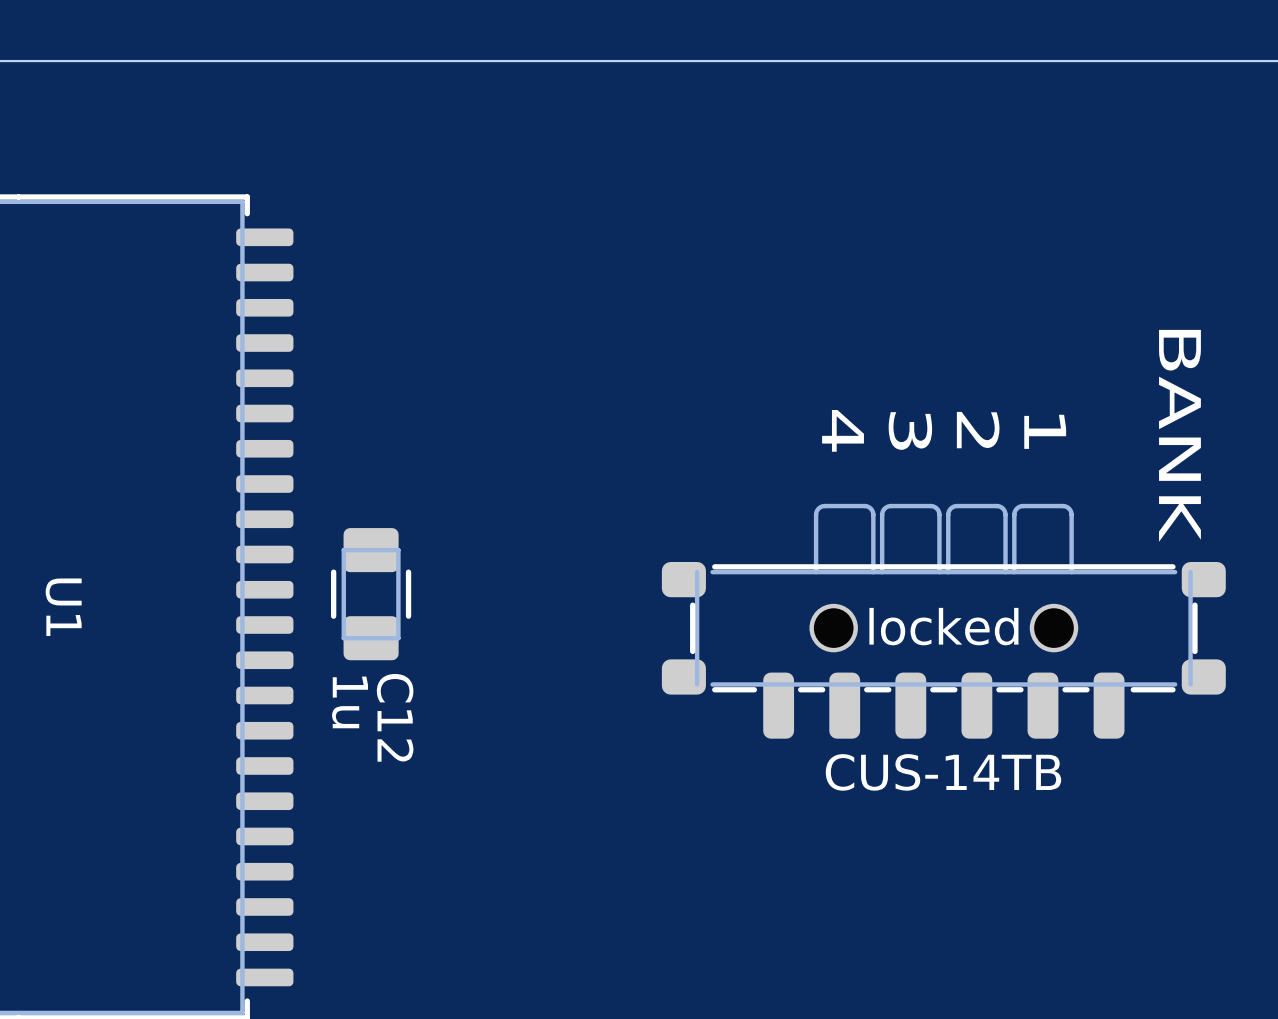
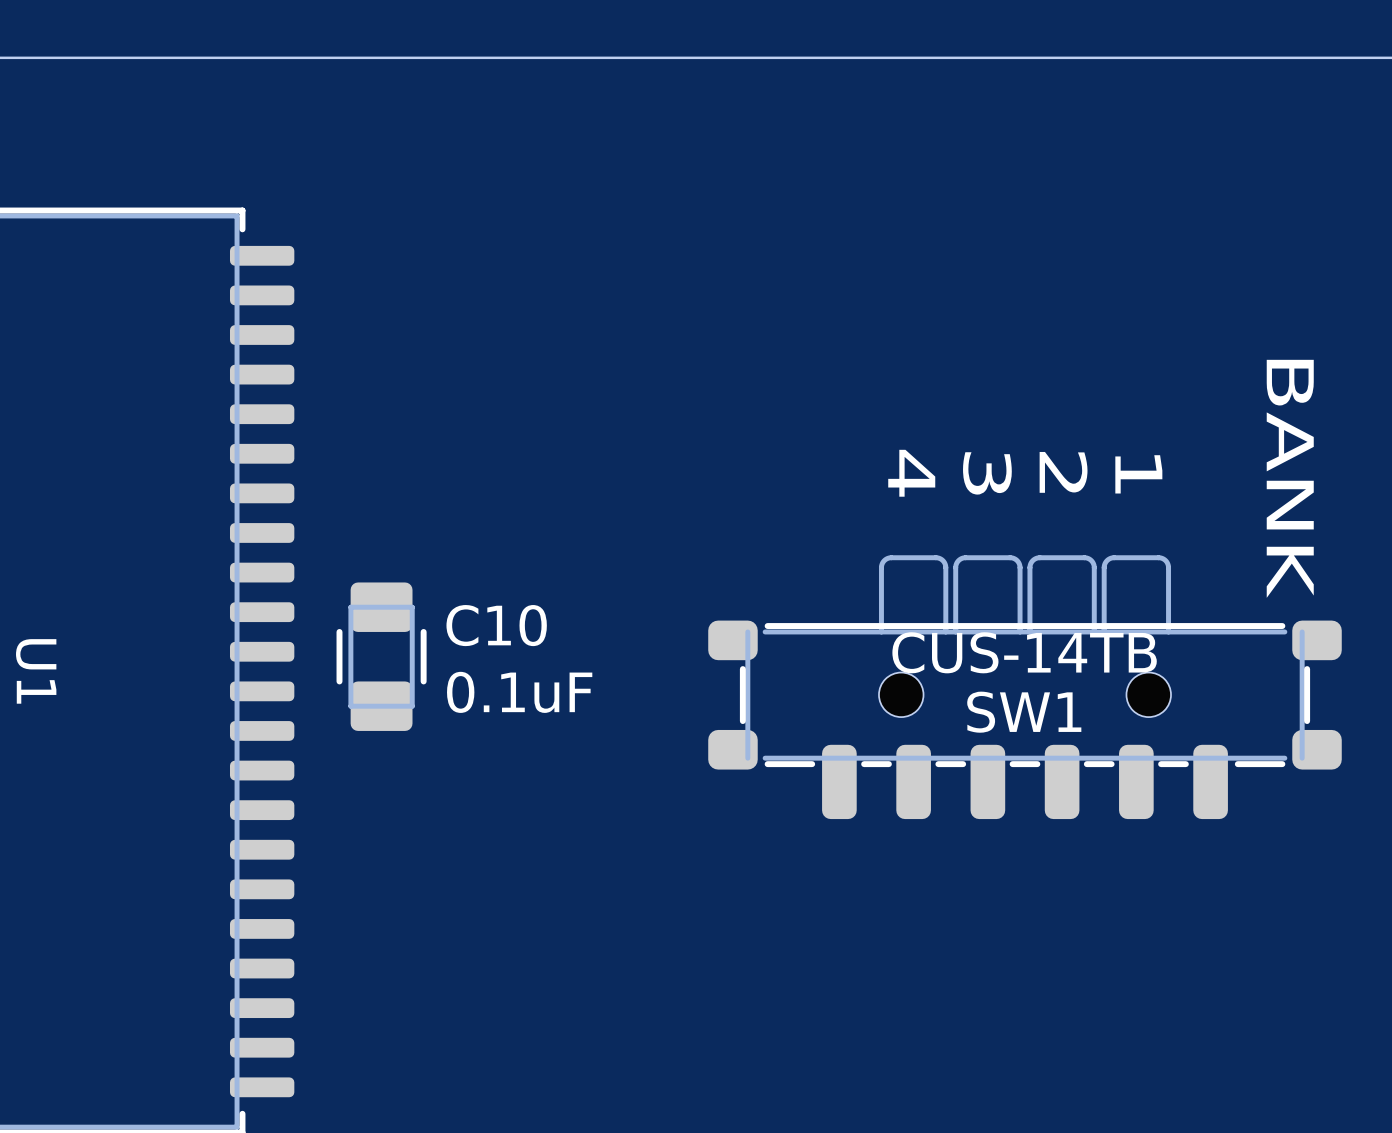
locked: CUS-14TB (943, 621) -> none
SW1: none -> CUS-14TB (1024, 687)
C12 value: 1u (350, 702) -> 0.1uF (519, 692)
C12 name: C12 (395, 717) -> C10 (496, 625)

